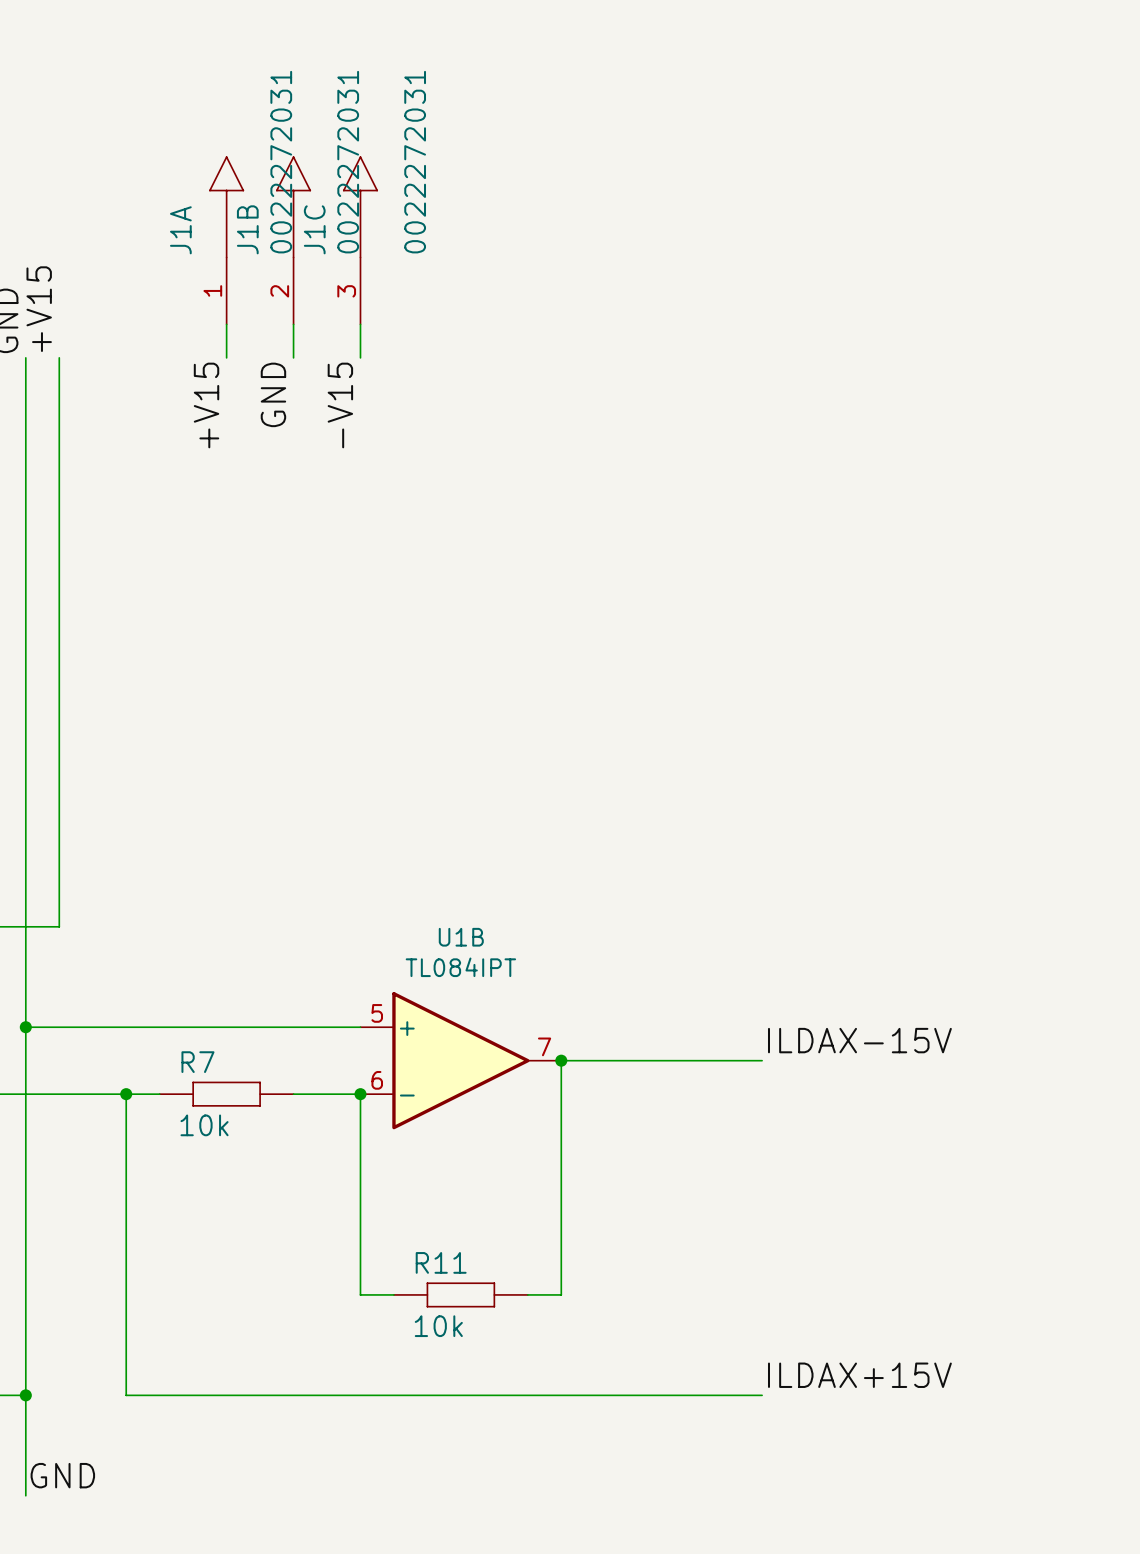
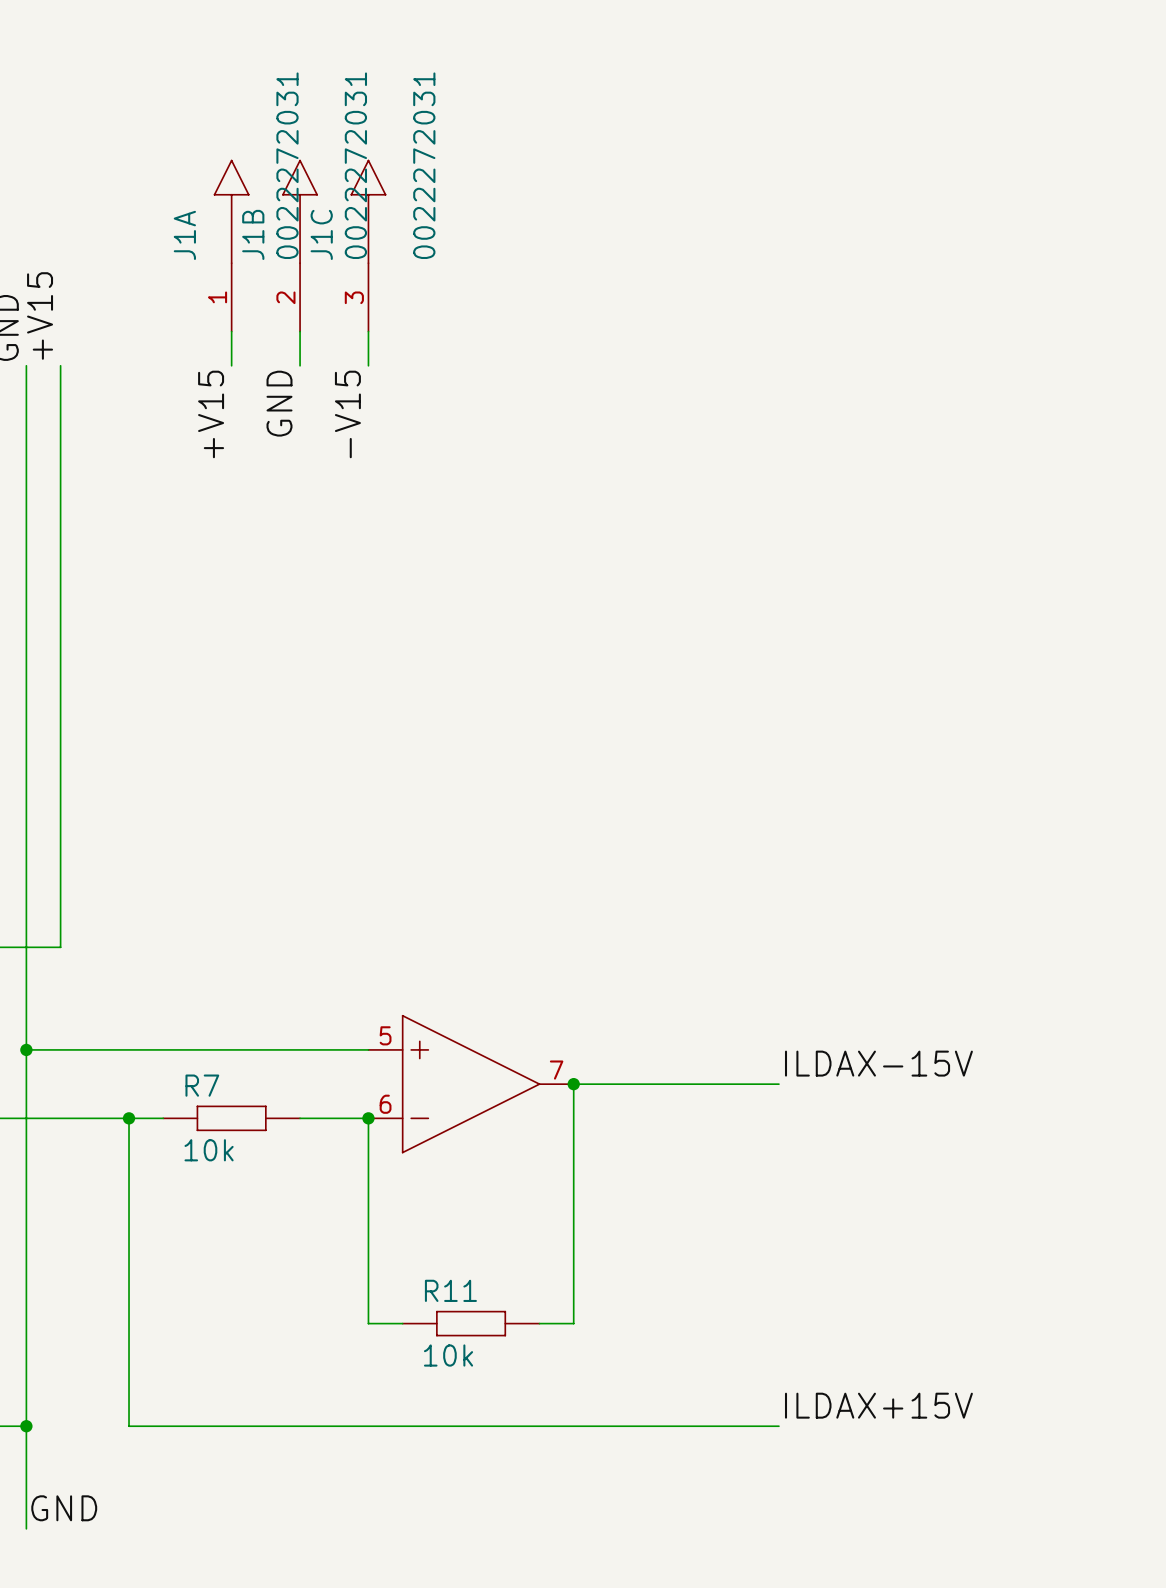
U1B: TL084IPT (460, 1060) -> none
part: none -> (471, 1084)

